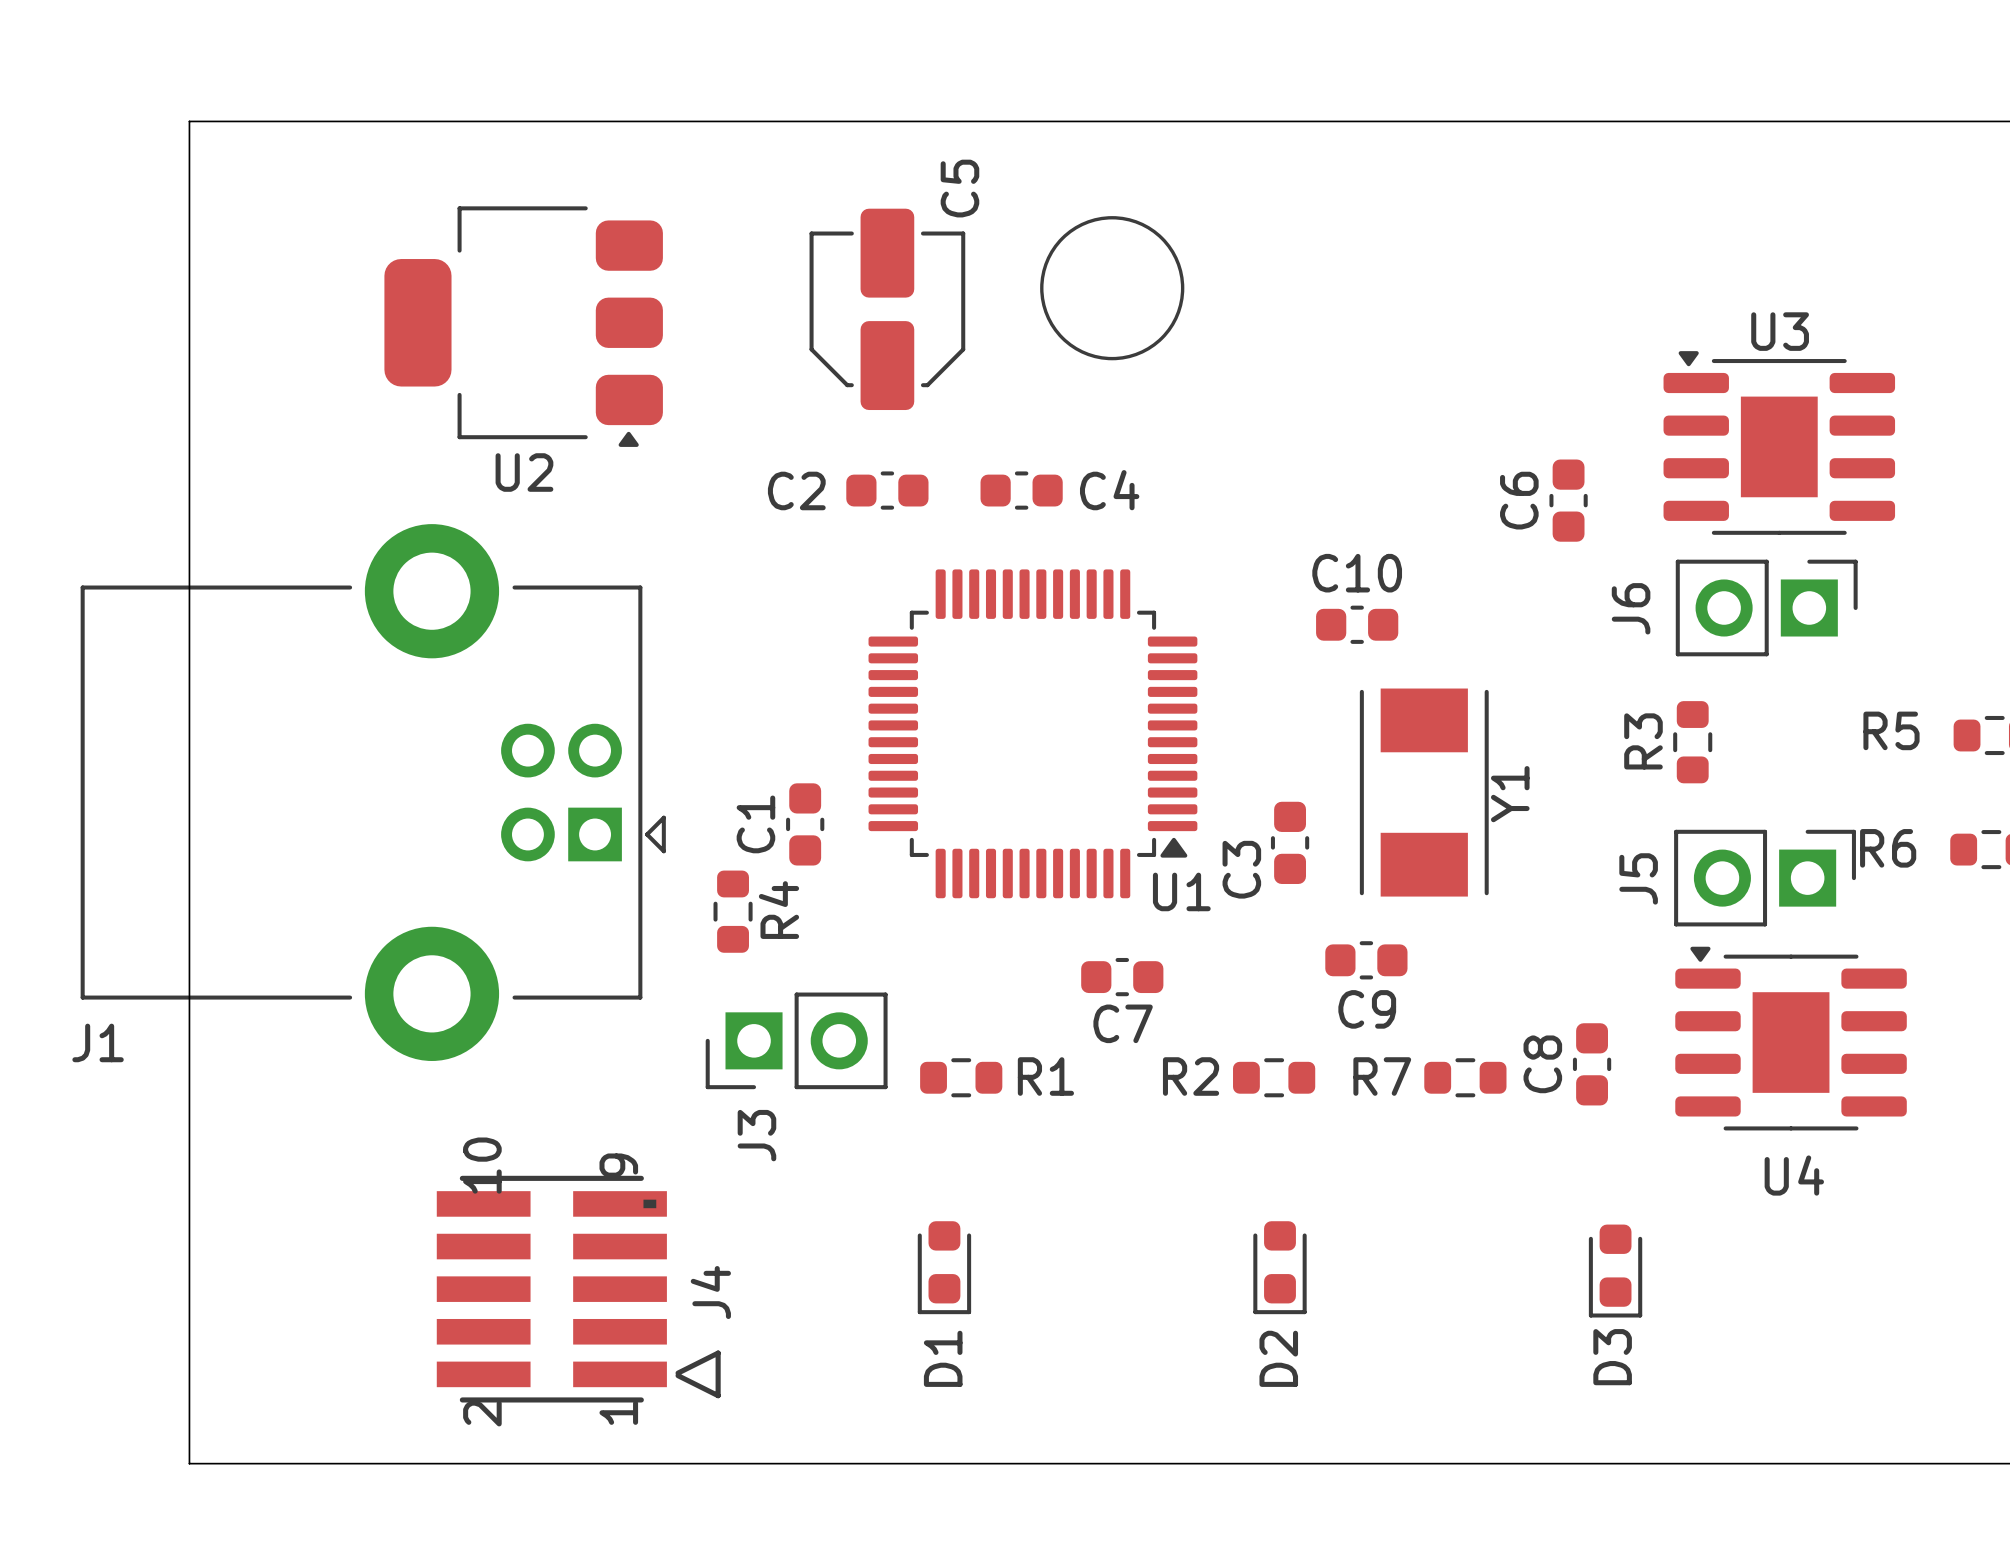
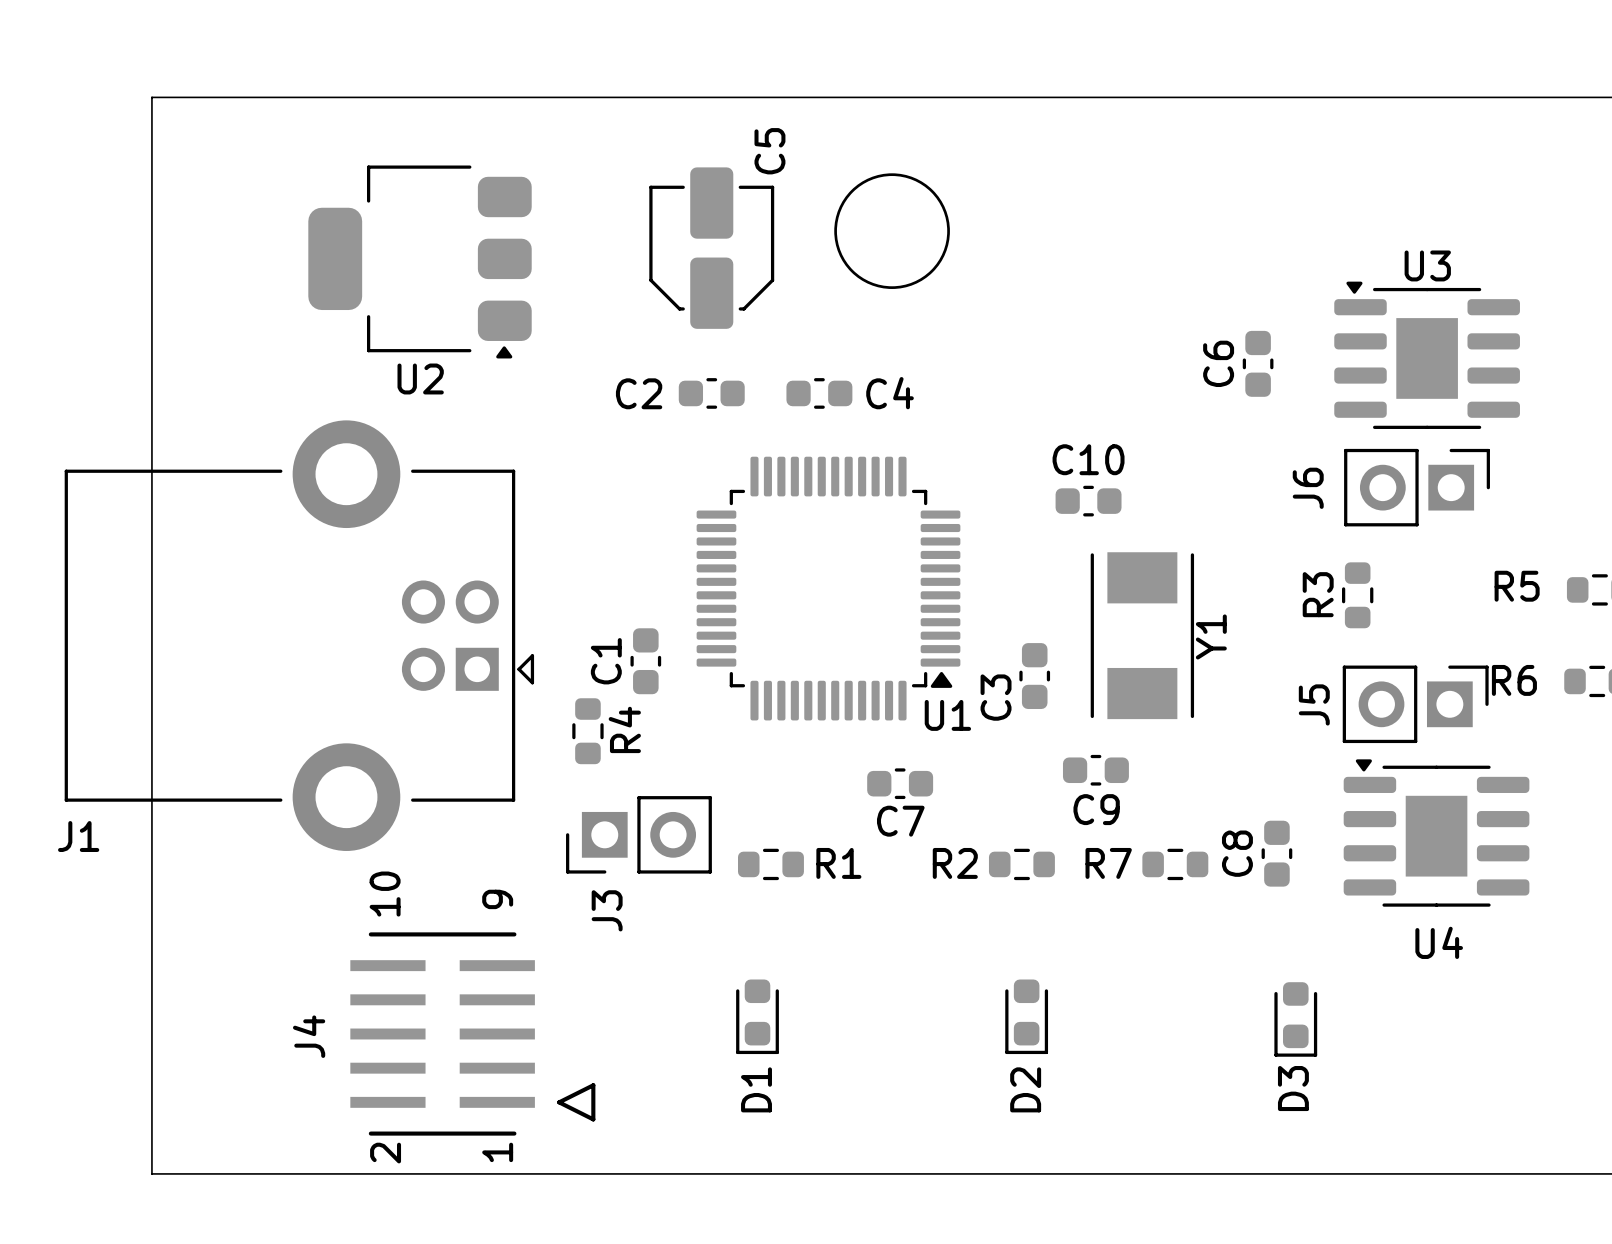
C6 position: (1568, 500) -> (1258, 363)
J4 footprint: [436, 1175, 721, 1403] -> [350, 932, 596, 1136]
J4 name position: J4 (710, 1292) -> J4 (309, 1036)

